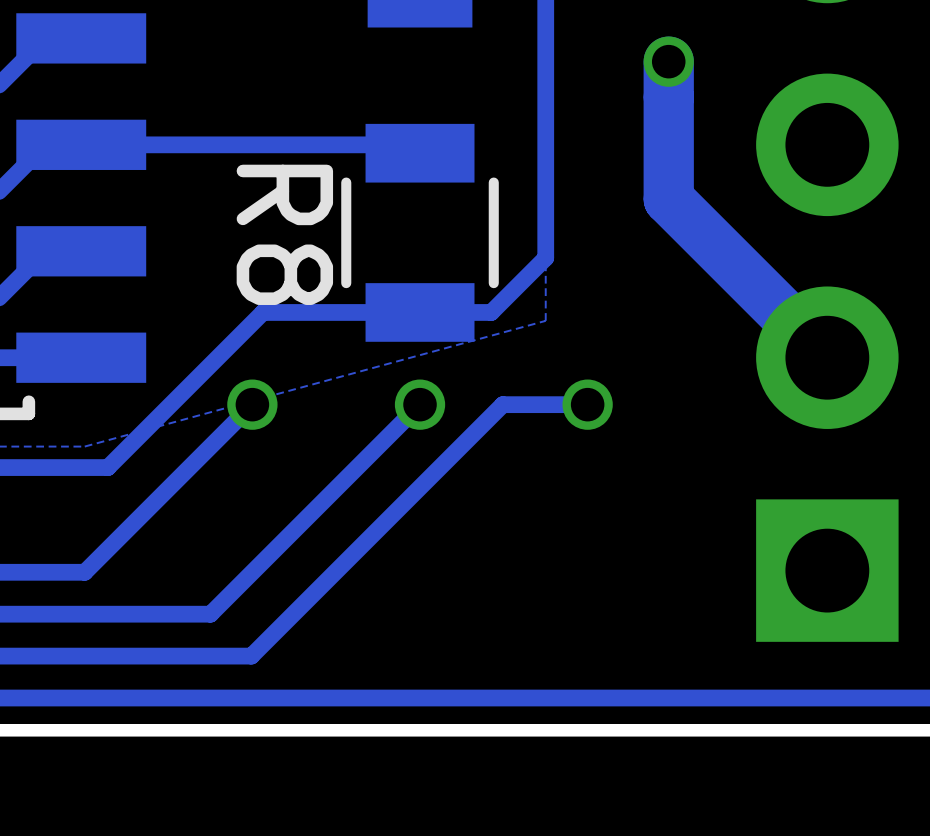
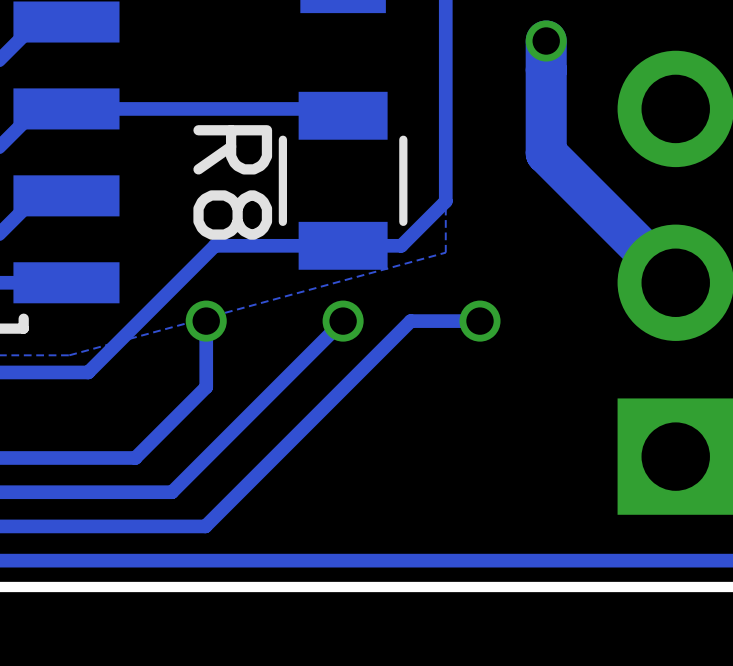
track: (252, 404) (84, 572) -> (206, 321) (206, 387) (135, 457) (69, 457)

